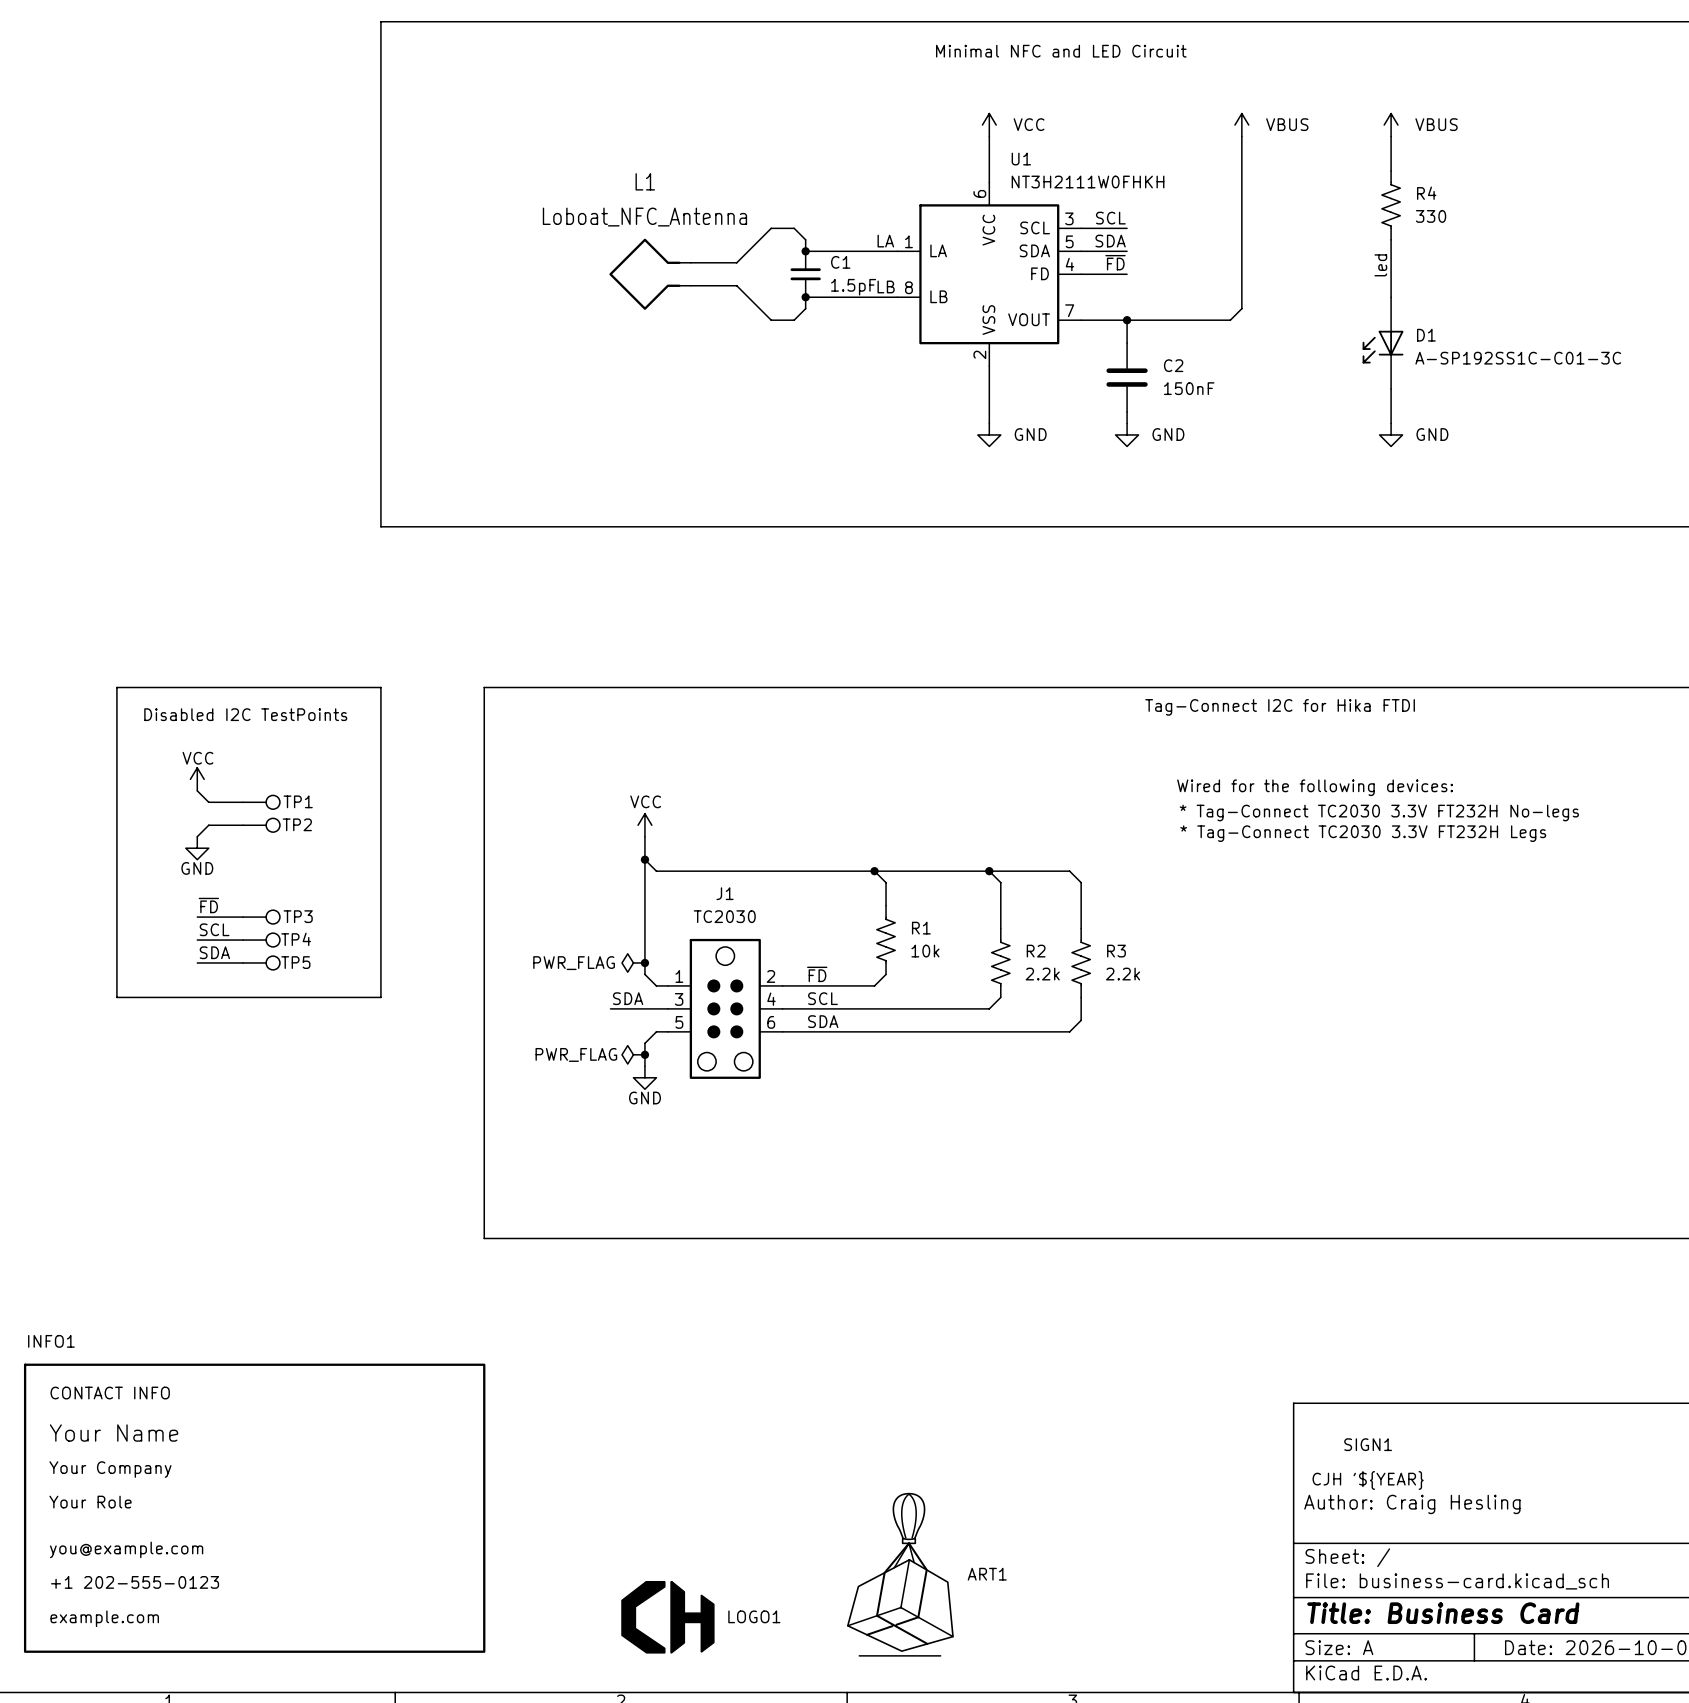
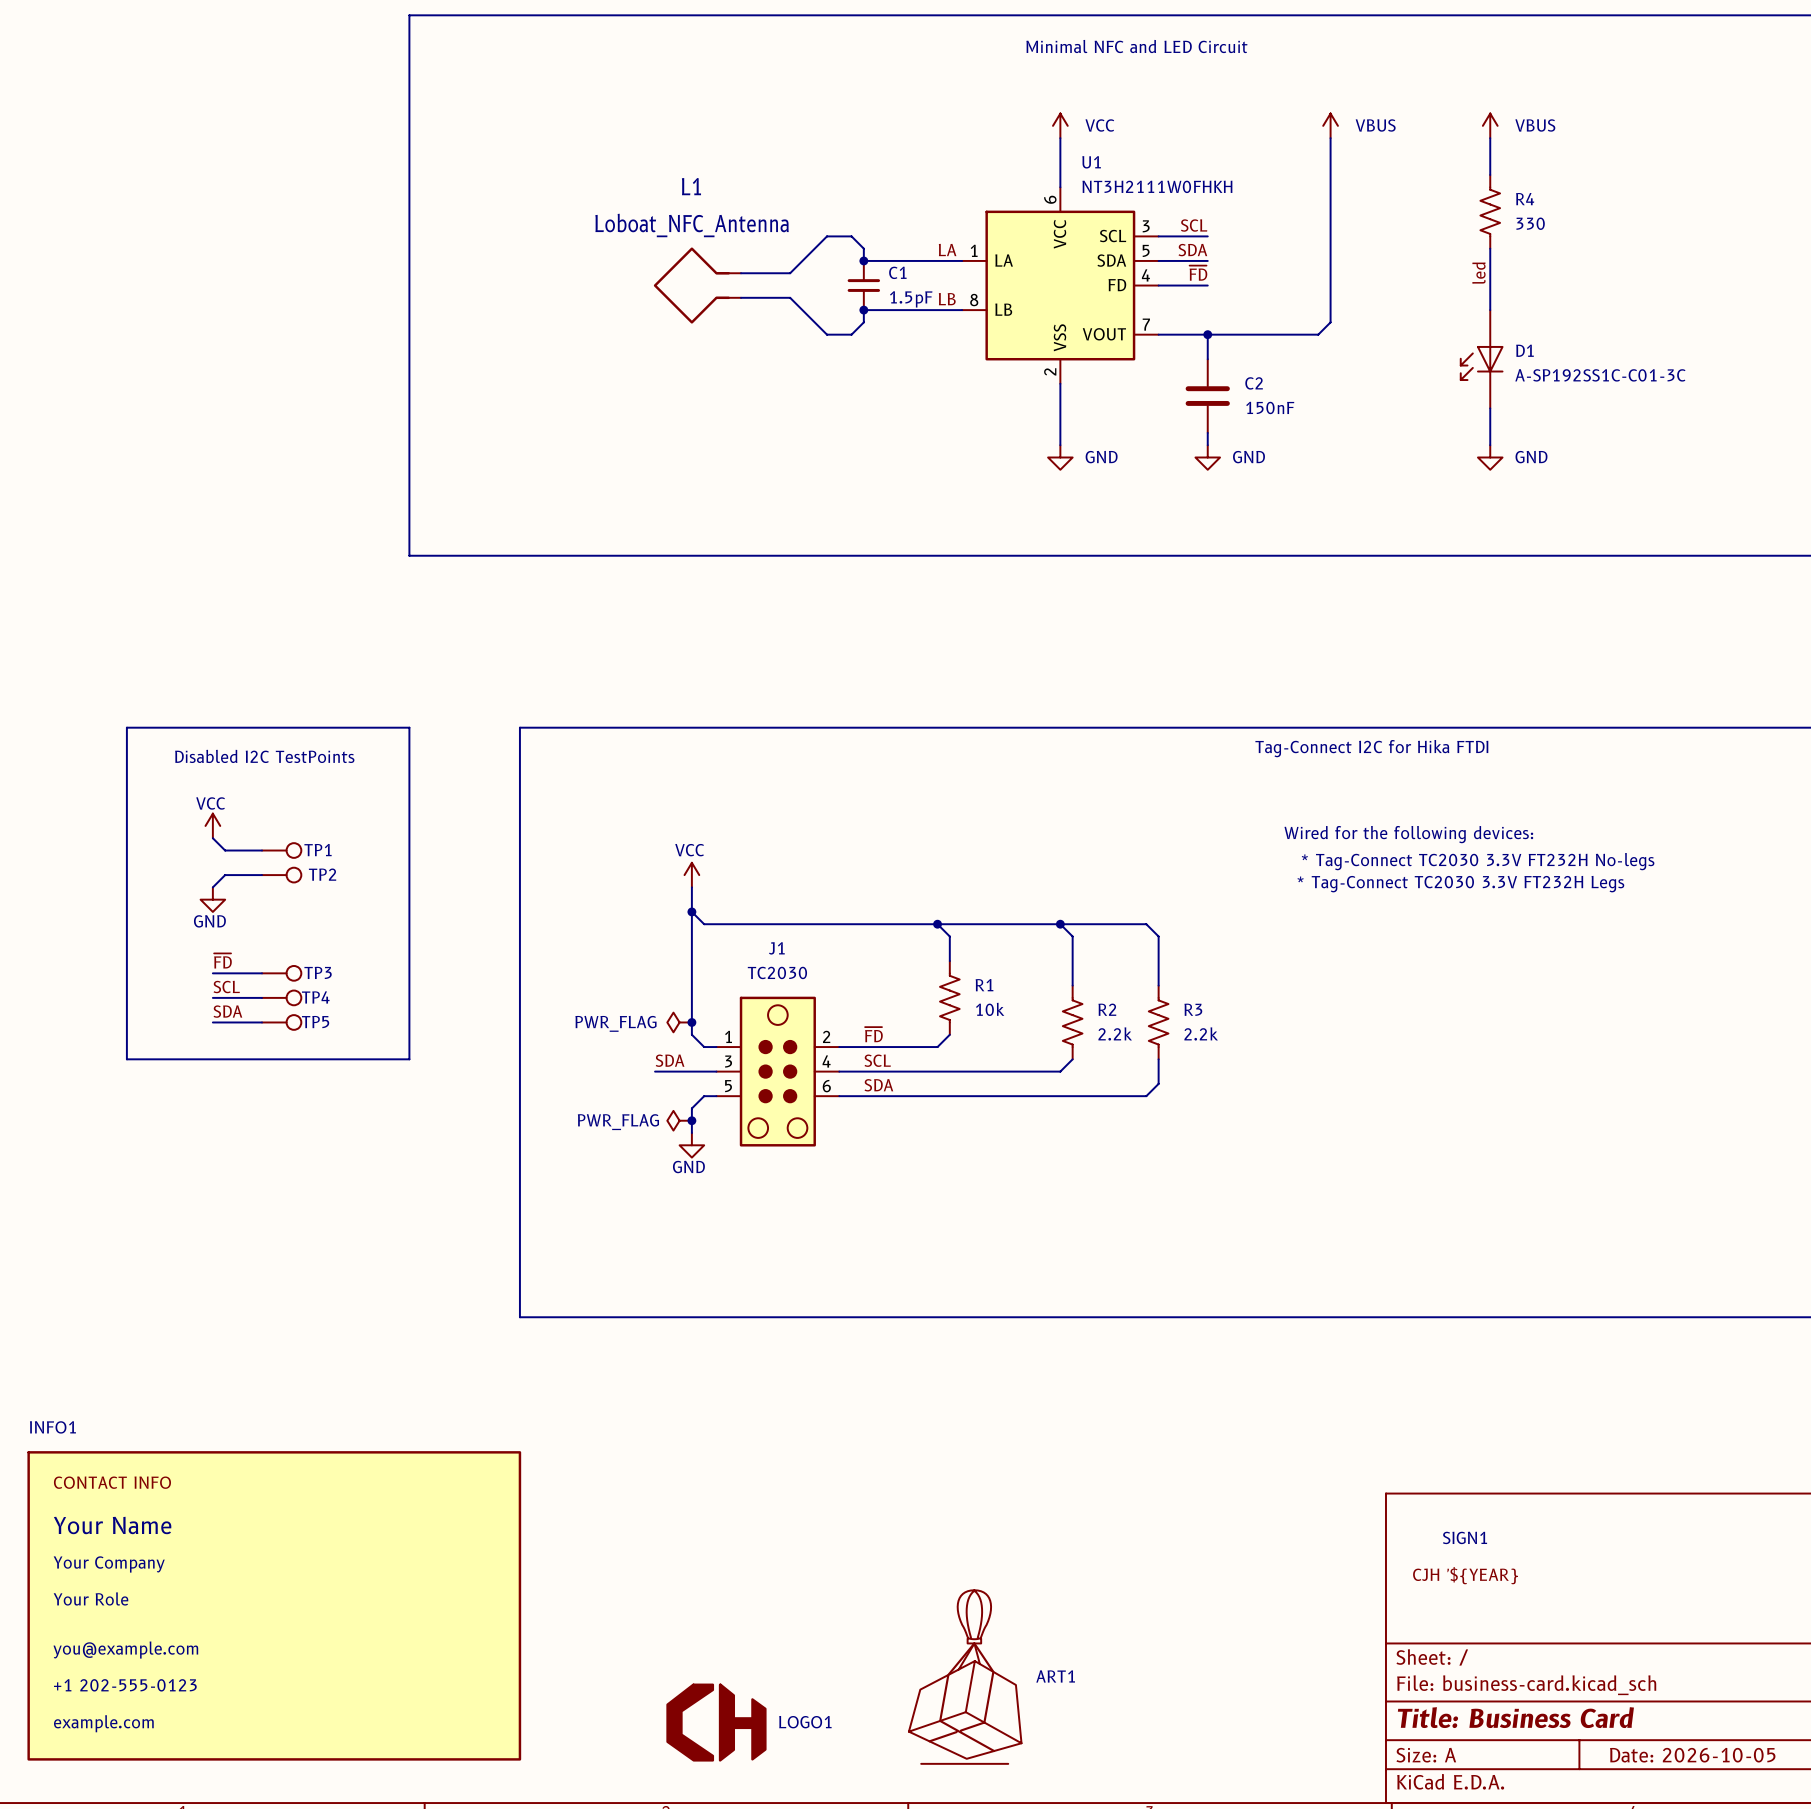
title block: Author: Craig Hesling (1412, 1504) -> none

